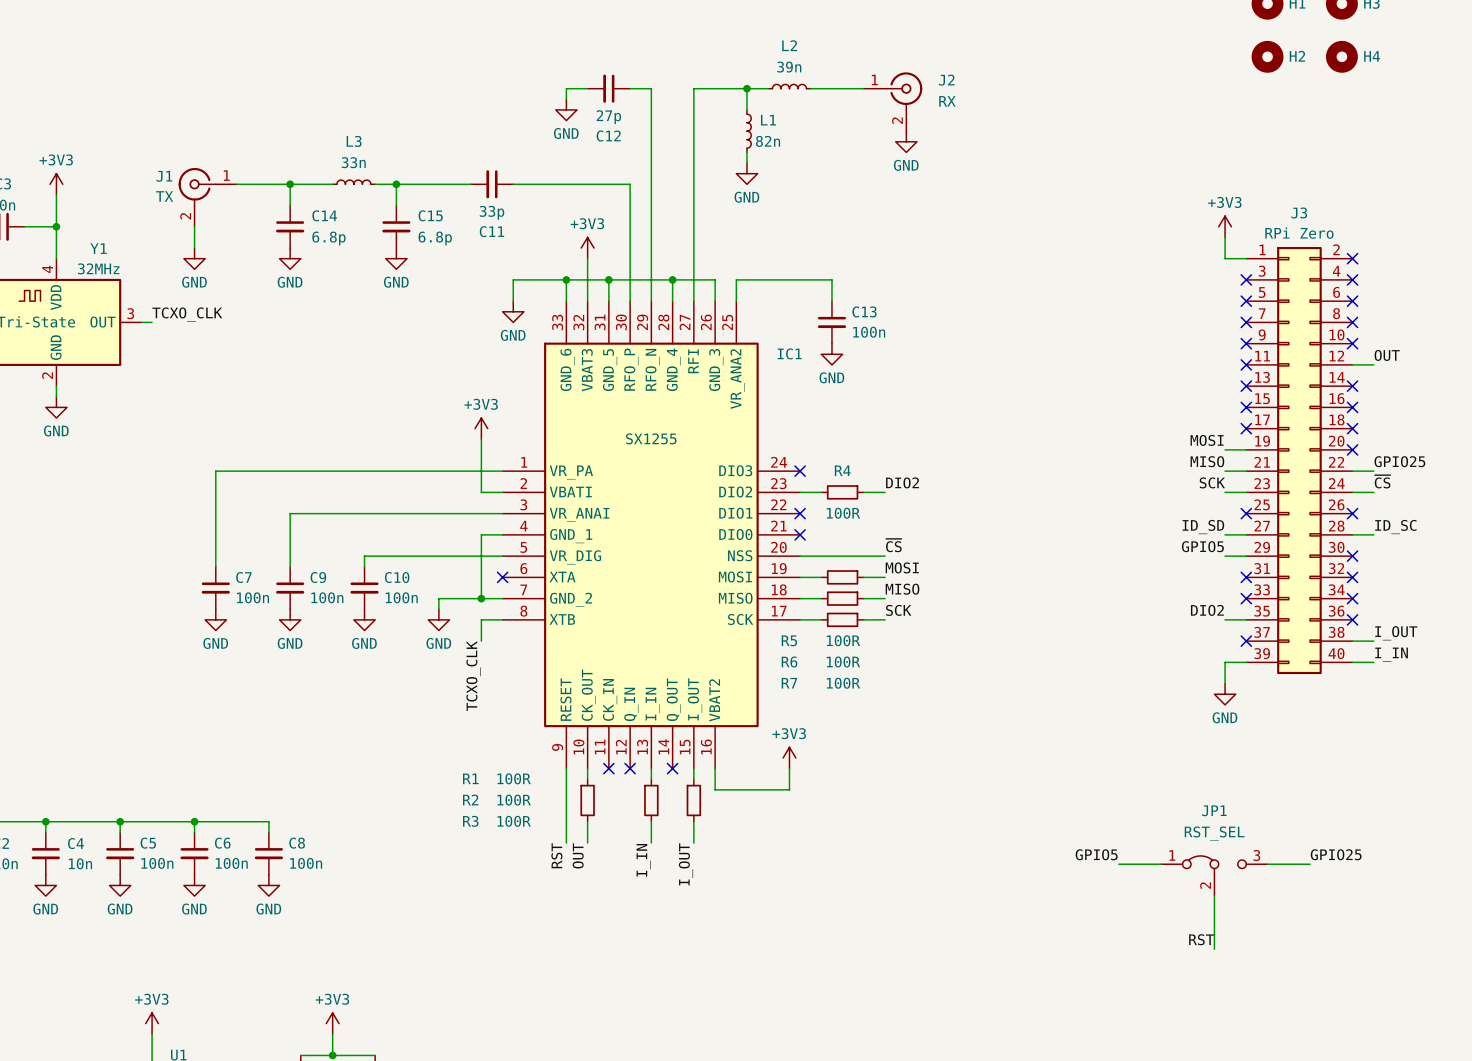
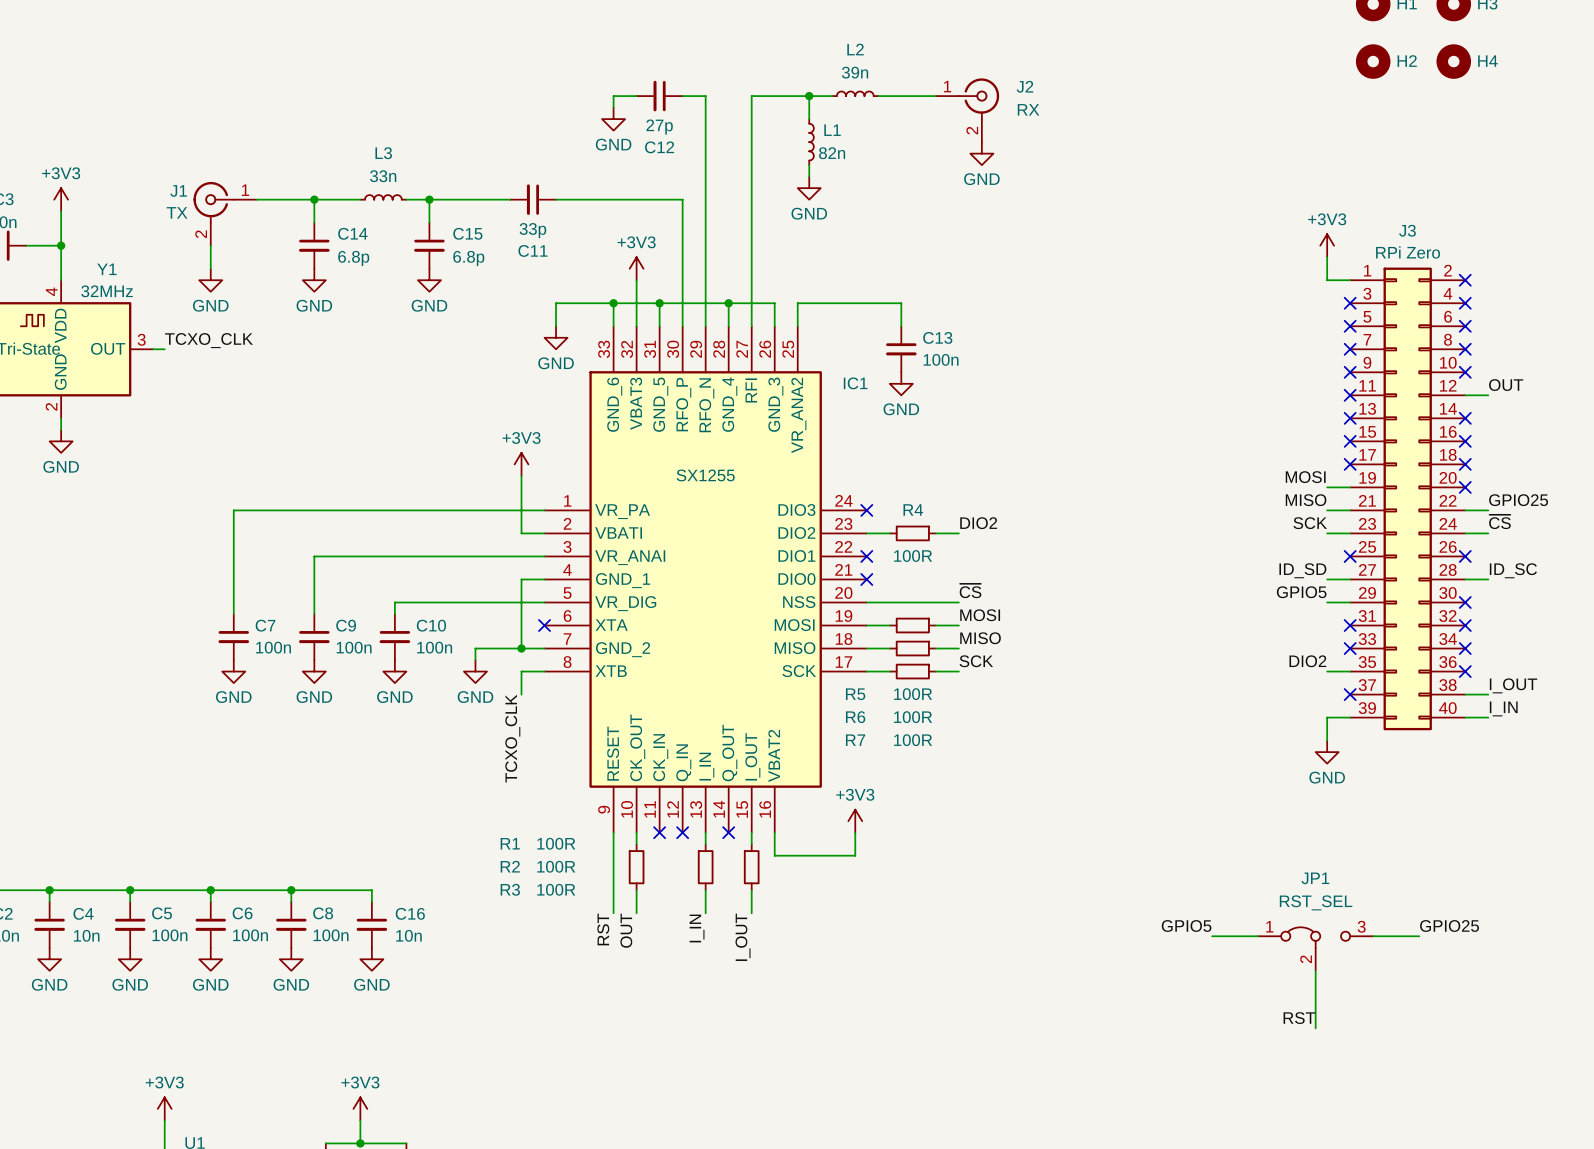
wire: none -> (291, 890) (371, 890) (371, 901)
junction: none -> (291, 890)
C16: none -> 10n (371, 924)
power symbol: none -> GND (371, 959)

